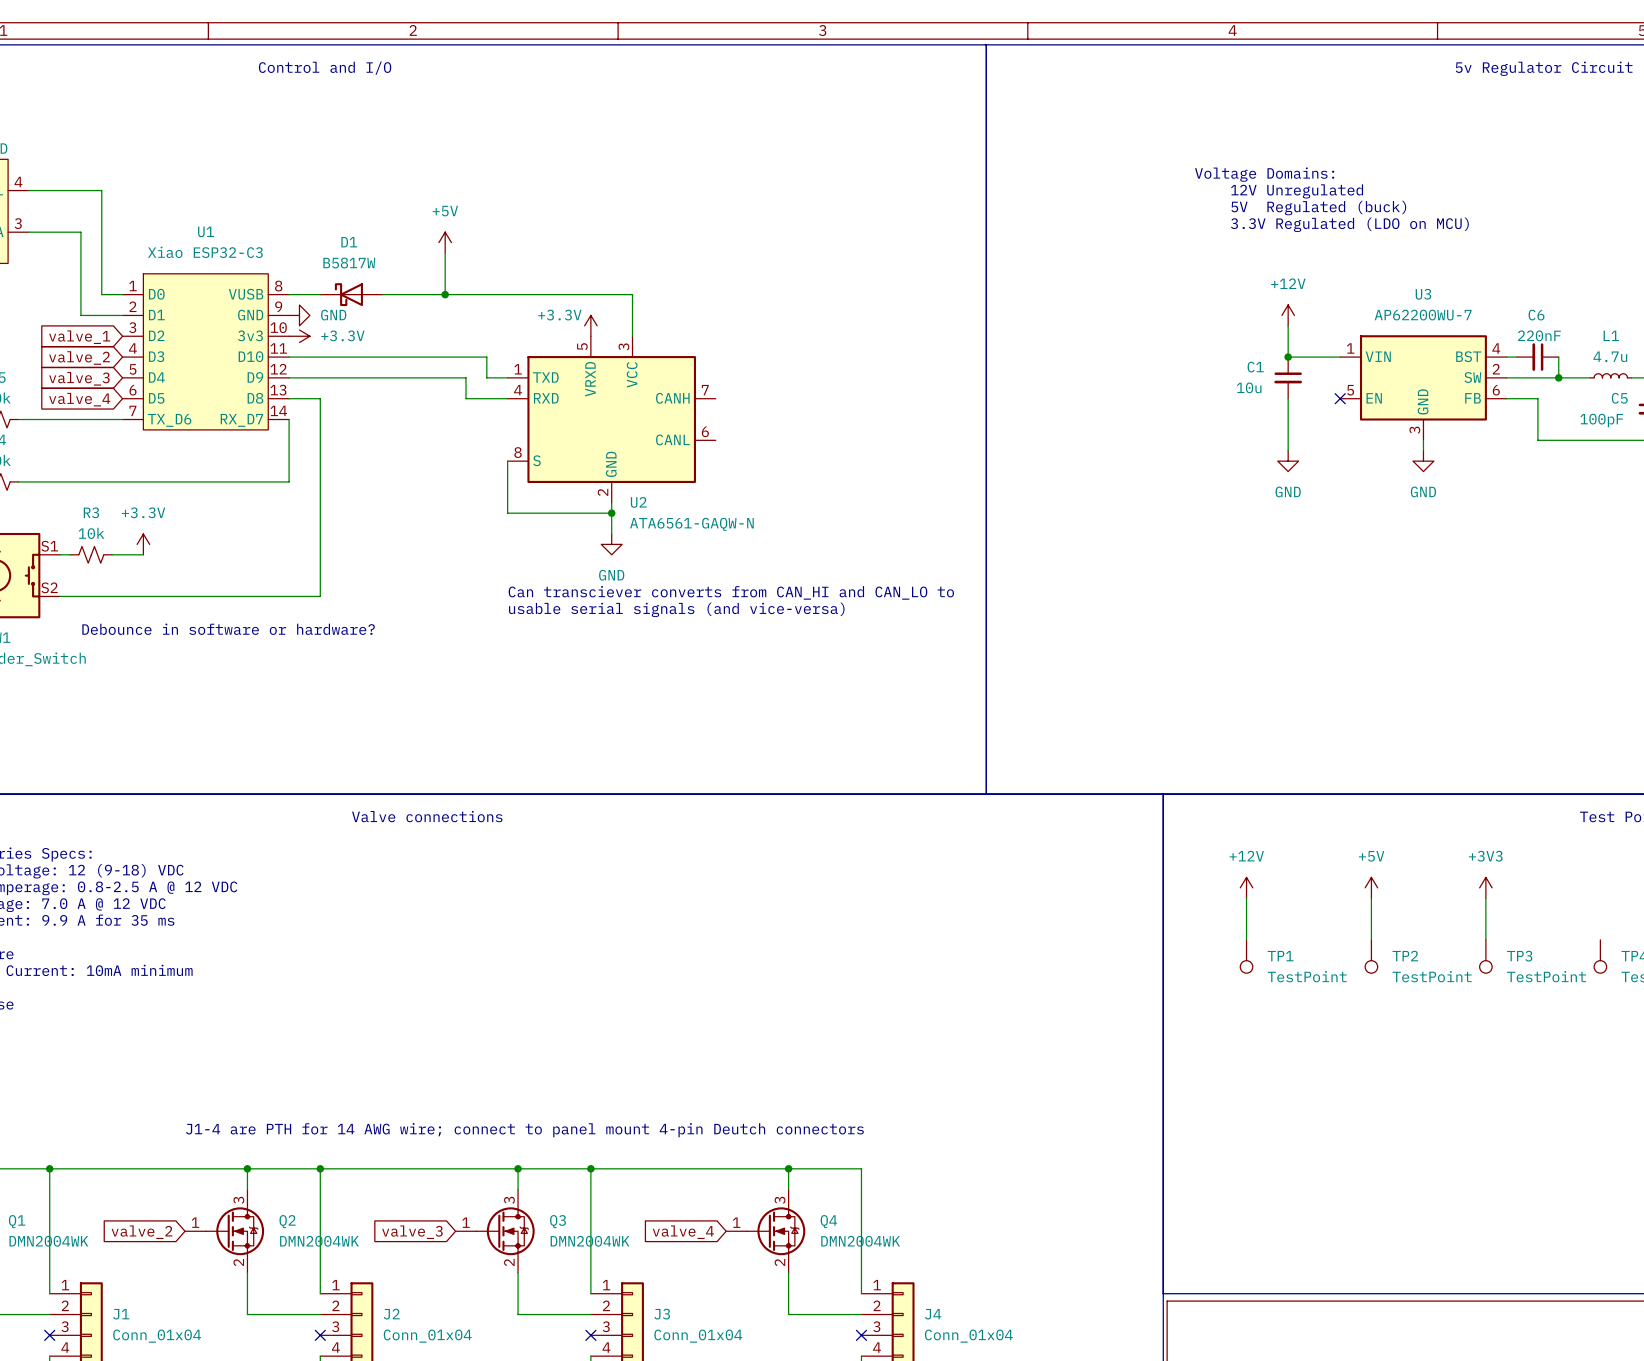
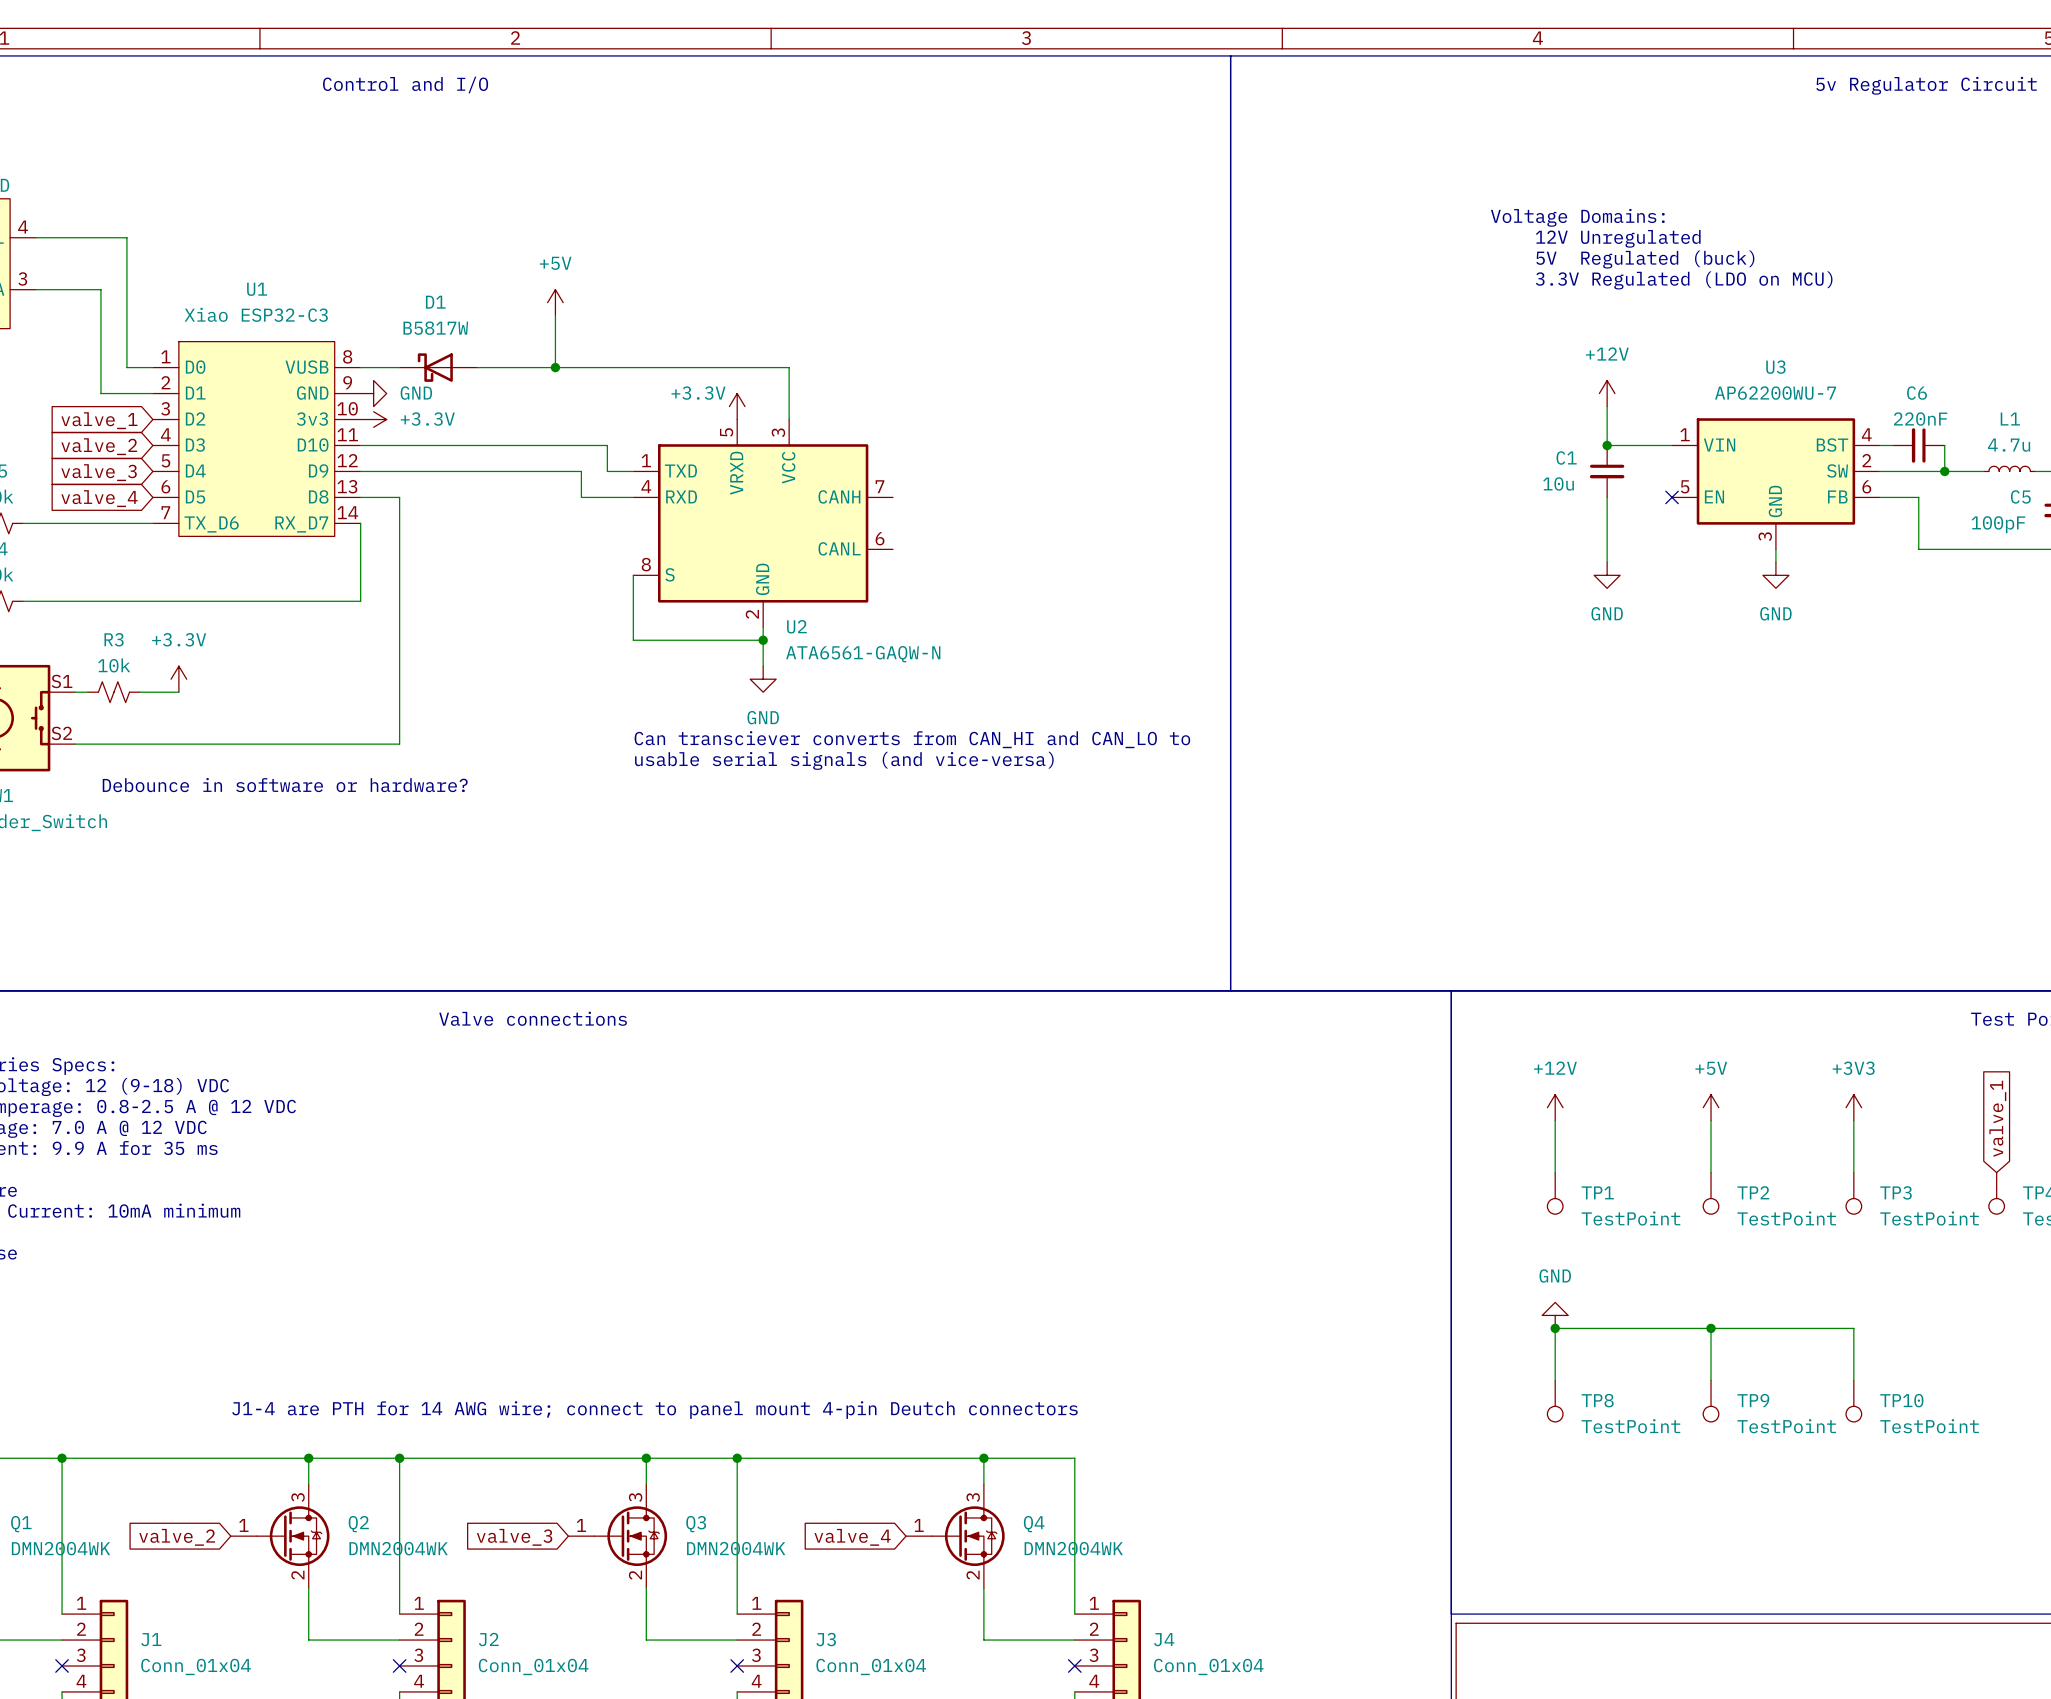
global label: none -> valve_1 (1997, 1118)
power symbol: none -> GND (1555, 1315)
junction: none -> (1555, 1328)
wire: none -> (1711, 1328) (1711, 1380)
junction: none -> (1711, 1328)
wire: none -> (1555, 1380) (1555, 1328) (1853, 1328) (1853, 1380)
TP8: none -> TestPoint (1555, 1401)
TP9: none -> TestPoint (1711, 1401)
TP10: none -> TestPoint (1853, 1401)

